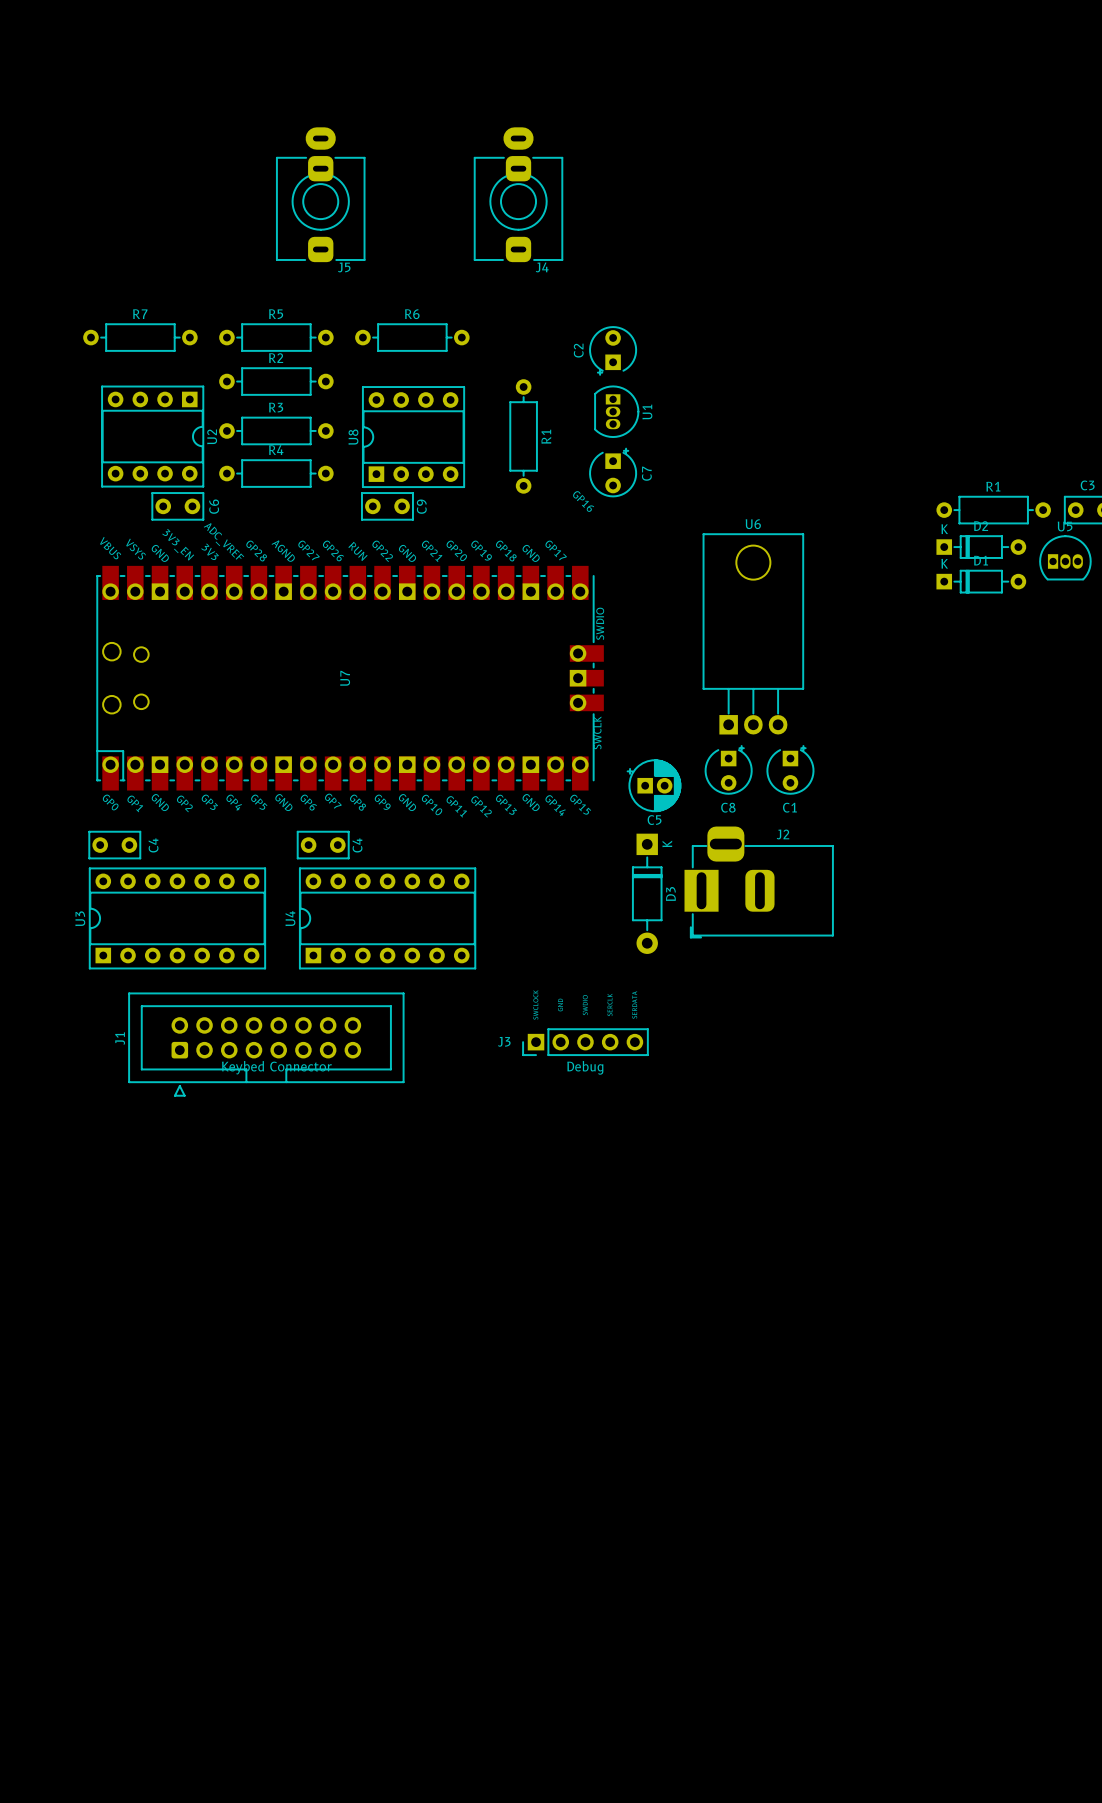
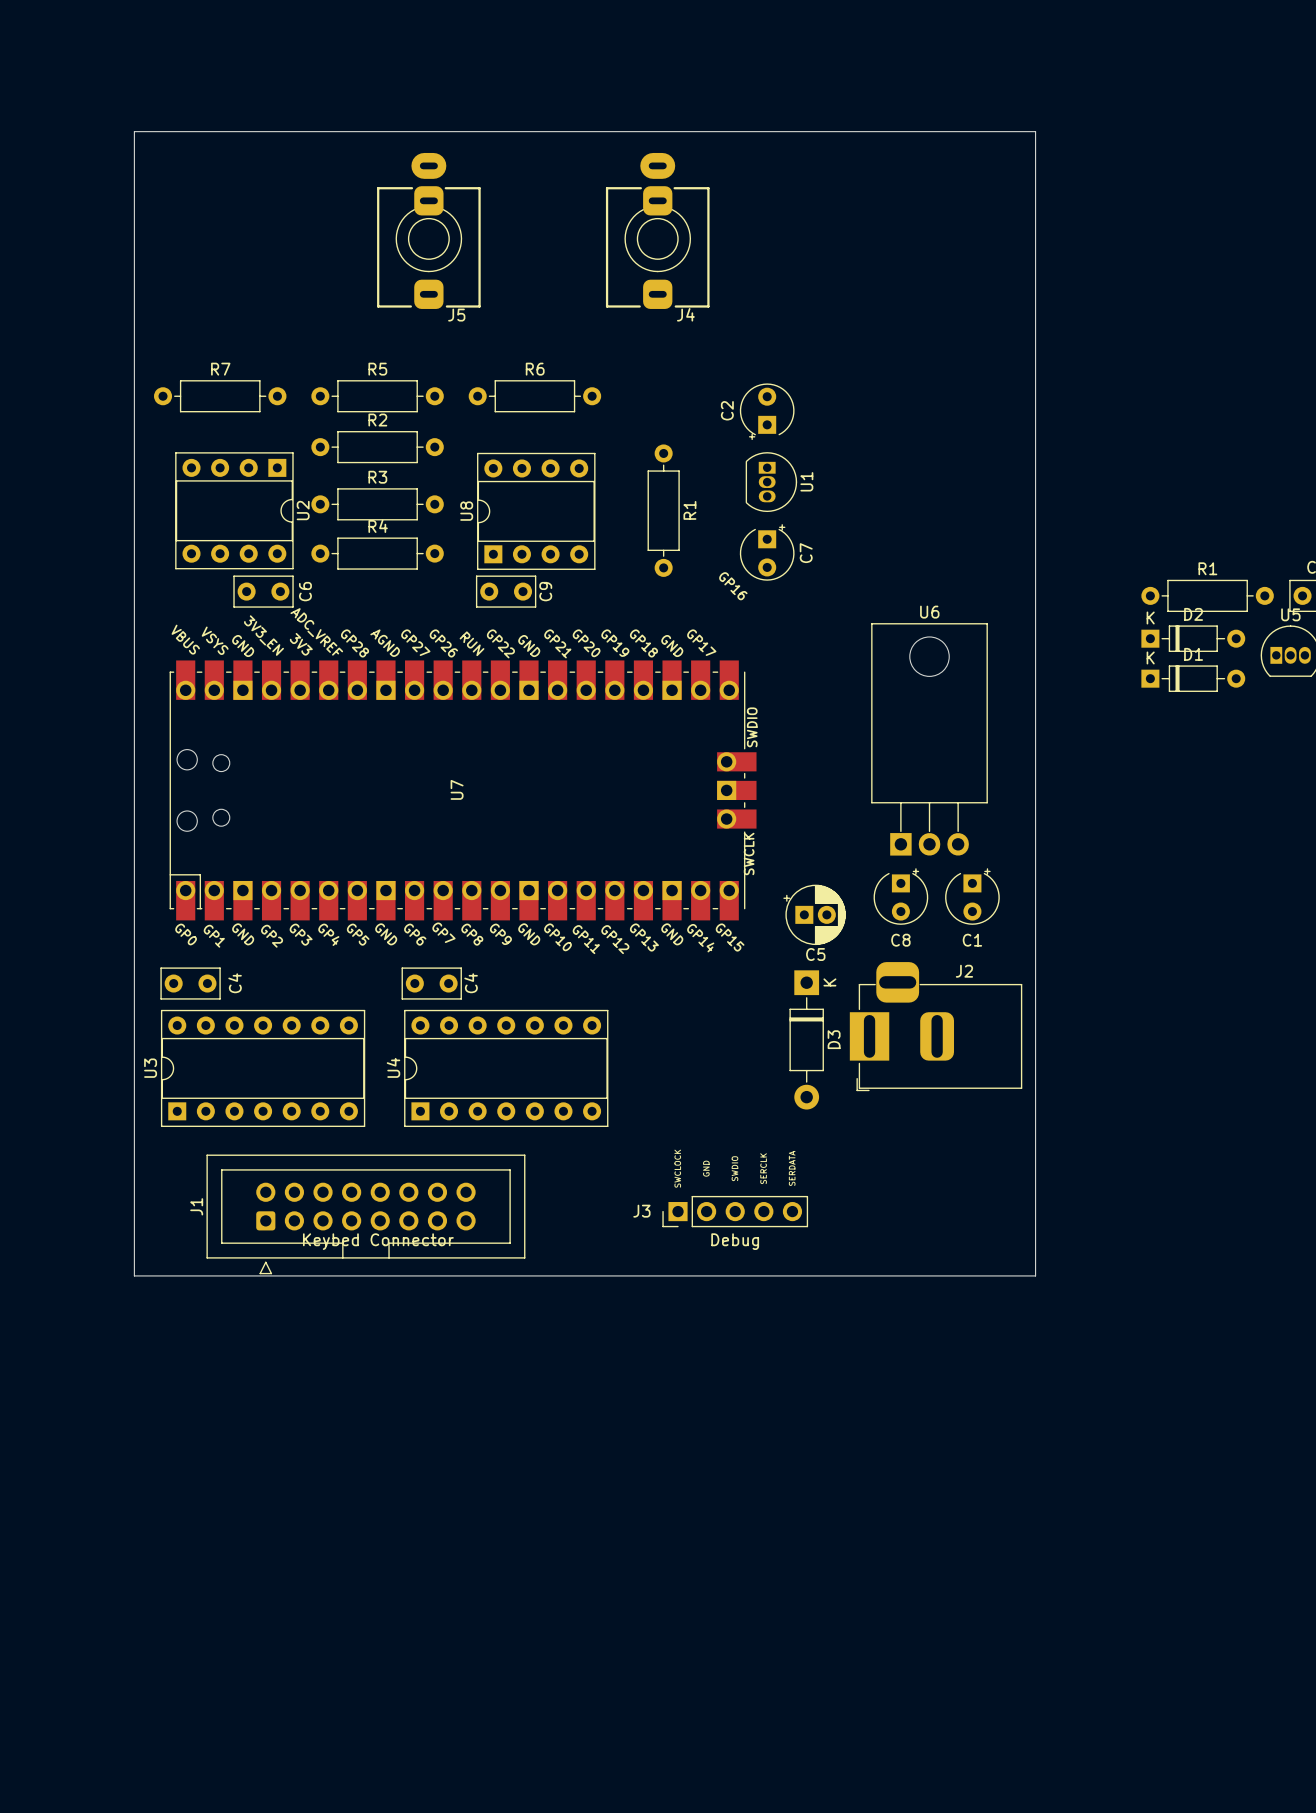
board edge: none -> (134, 131) (1035, 131) (1035, 1275) (134, 1275) (134, 131)

